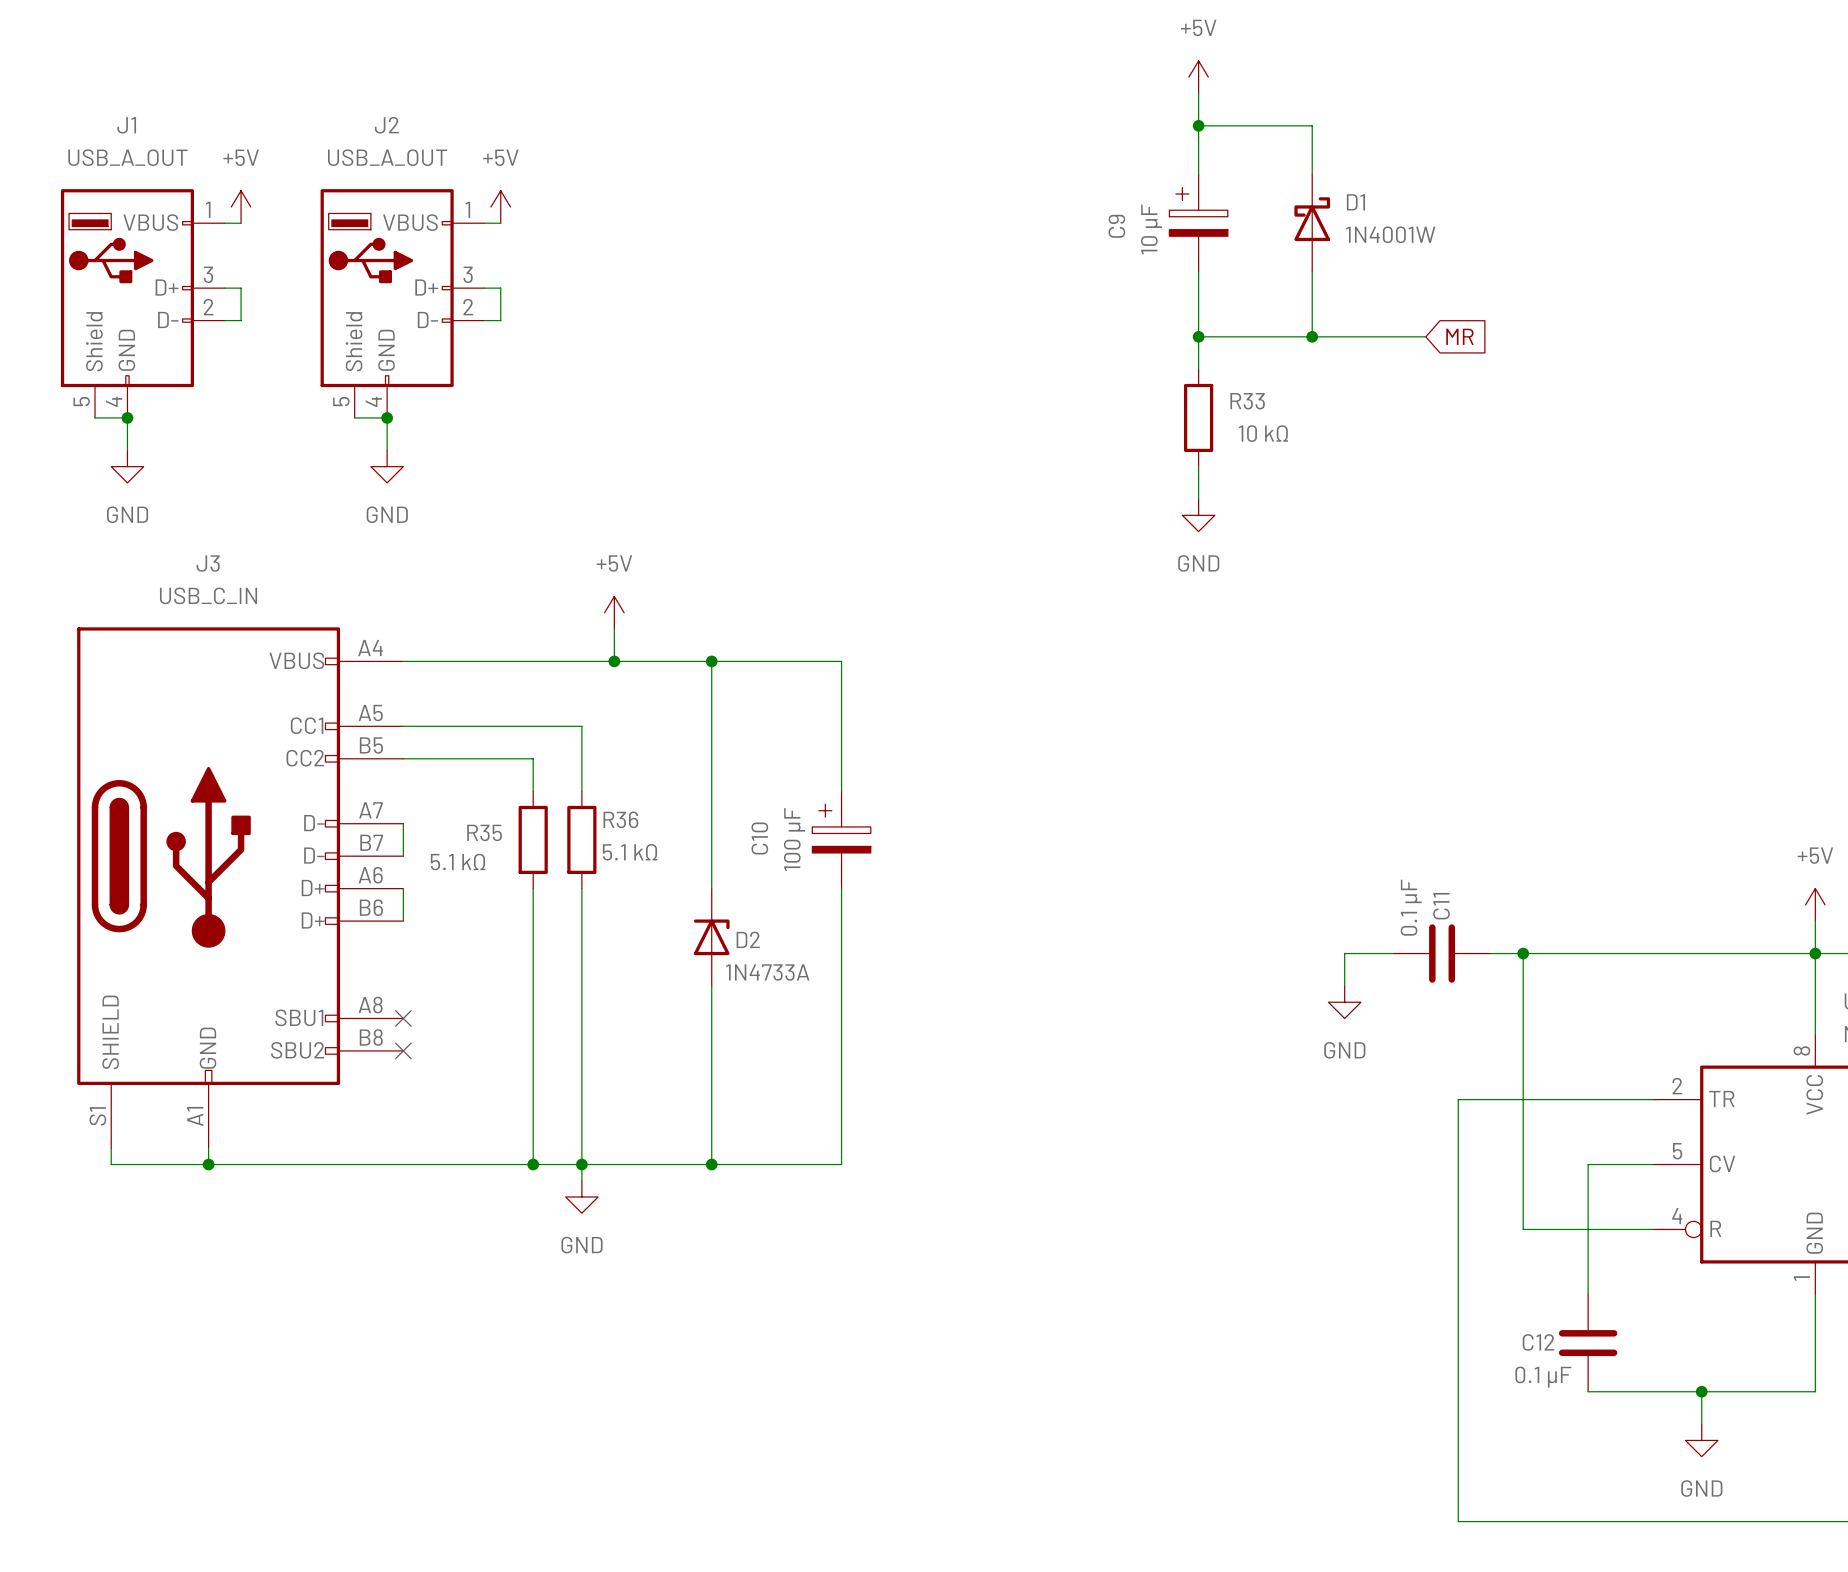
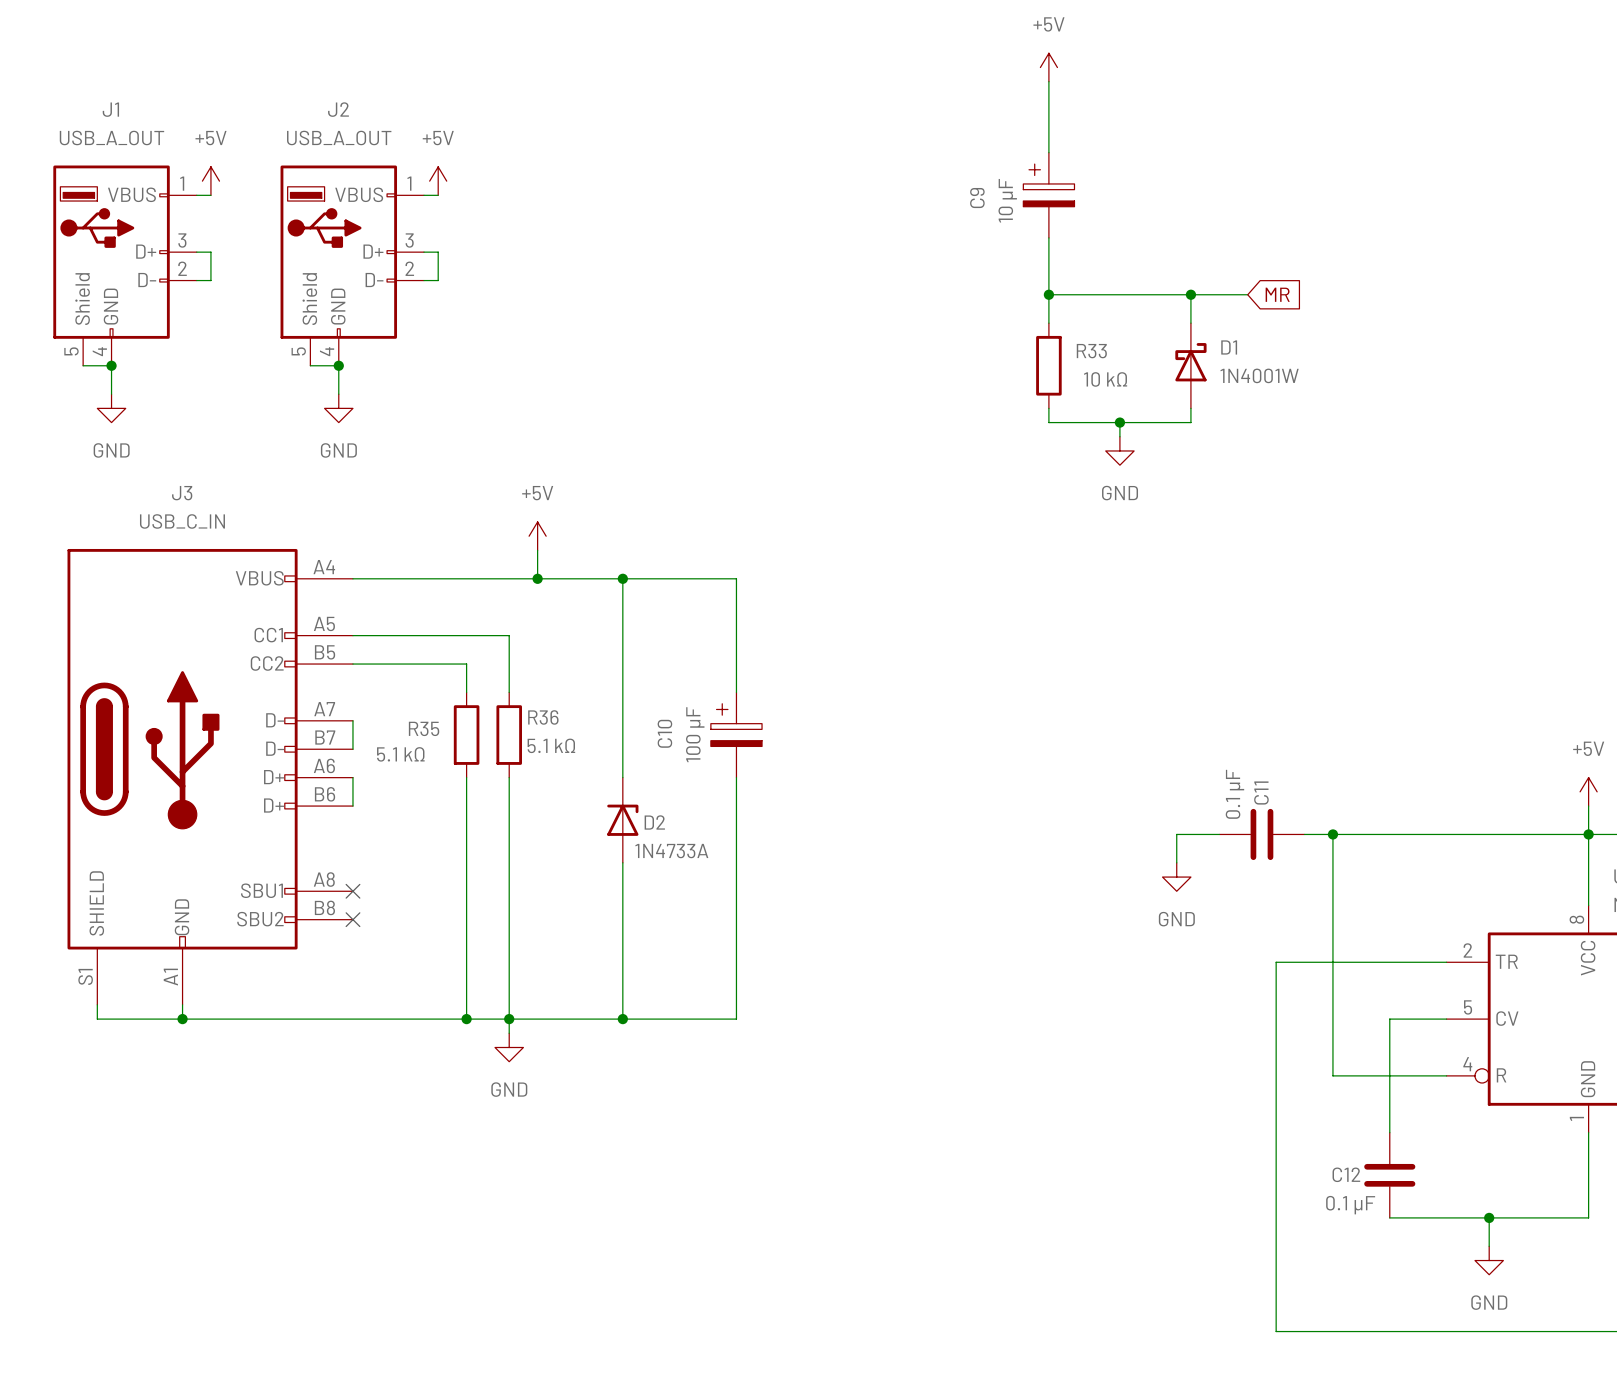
wire: (1198, 125) (1312, 125) (1312, 174) -> none
junction: (1198, 125) -> none
D1 position: (1312, 223) -> (1190, 365)
wire: (1312, 271) (1312, 336) -> none
junction position: (1312, 336) -> (1190, 294)
wire: none -> (1190, 294) (1190, 323)
wire: (1198, 482) (1198, 499) -> (1048, 422) (1190, 422) (1190, 408)
wire: none -> (1119, 422) (1119, 436)
junction: none -> (1119, 422)
power symbol position: GND (1198, 515) -> GND (1119, 450)

